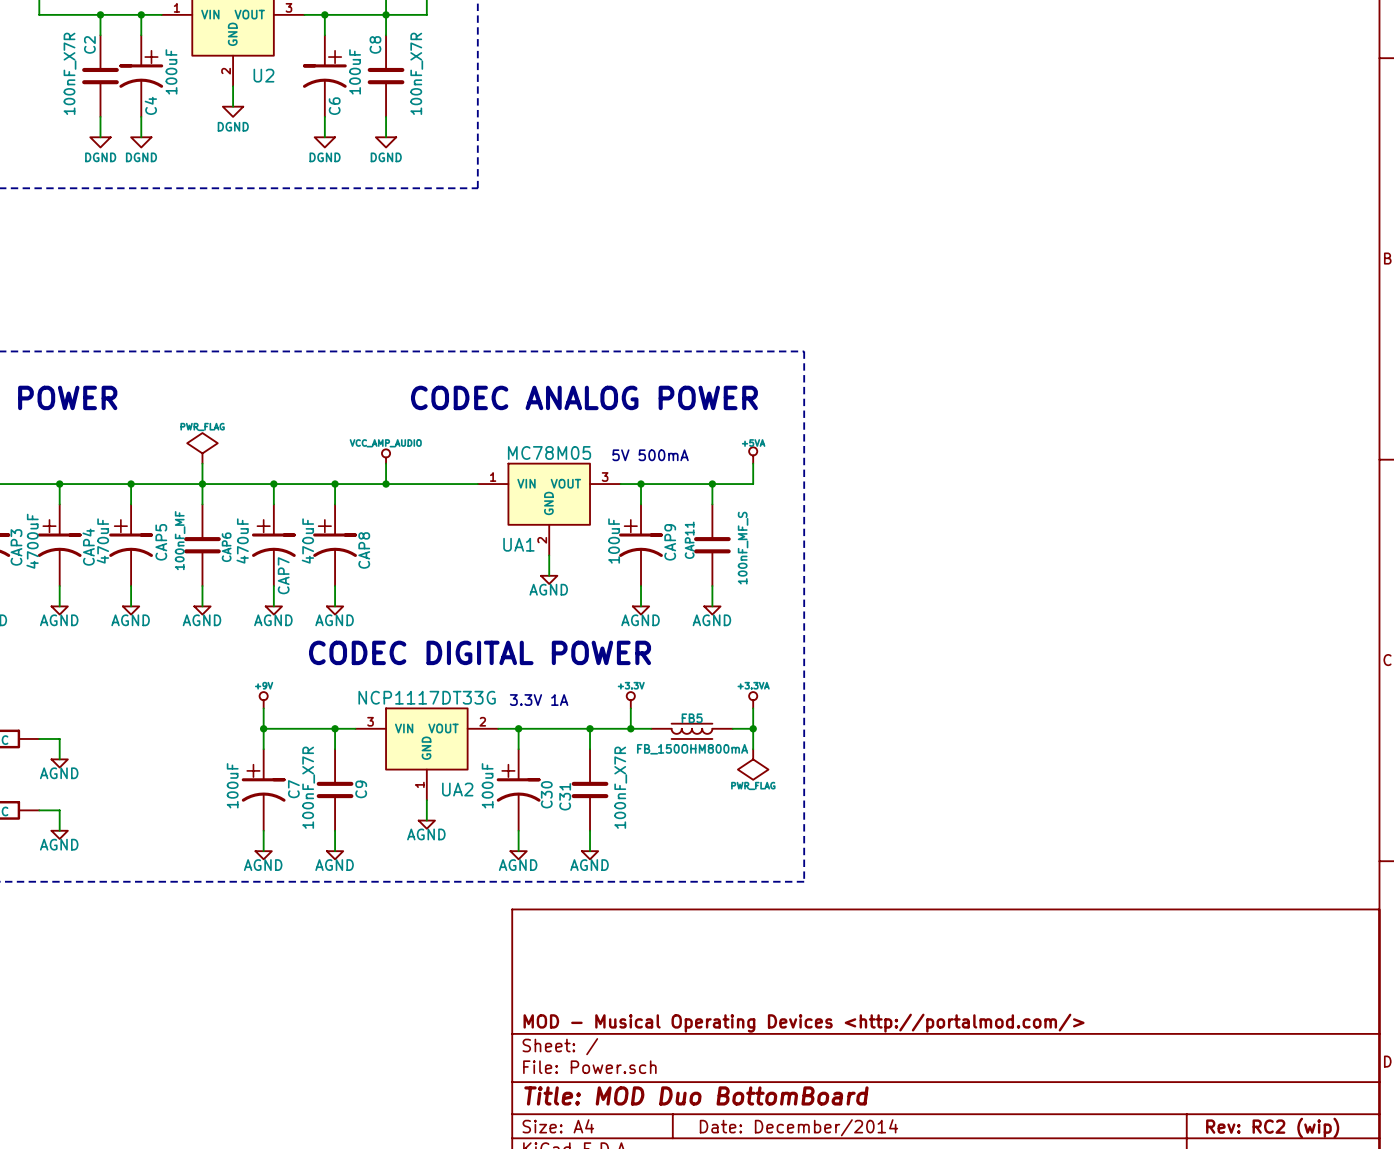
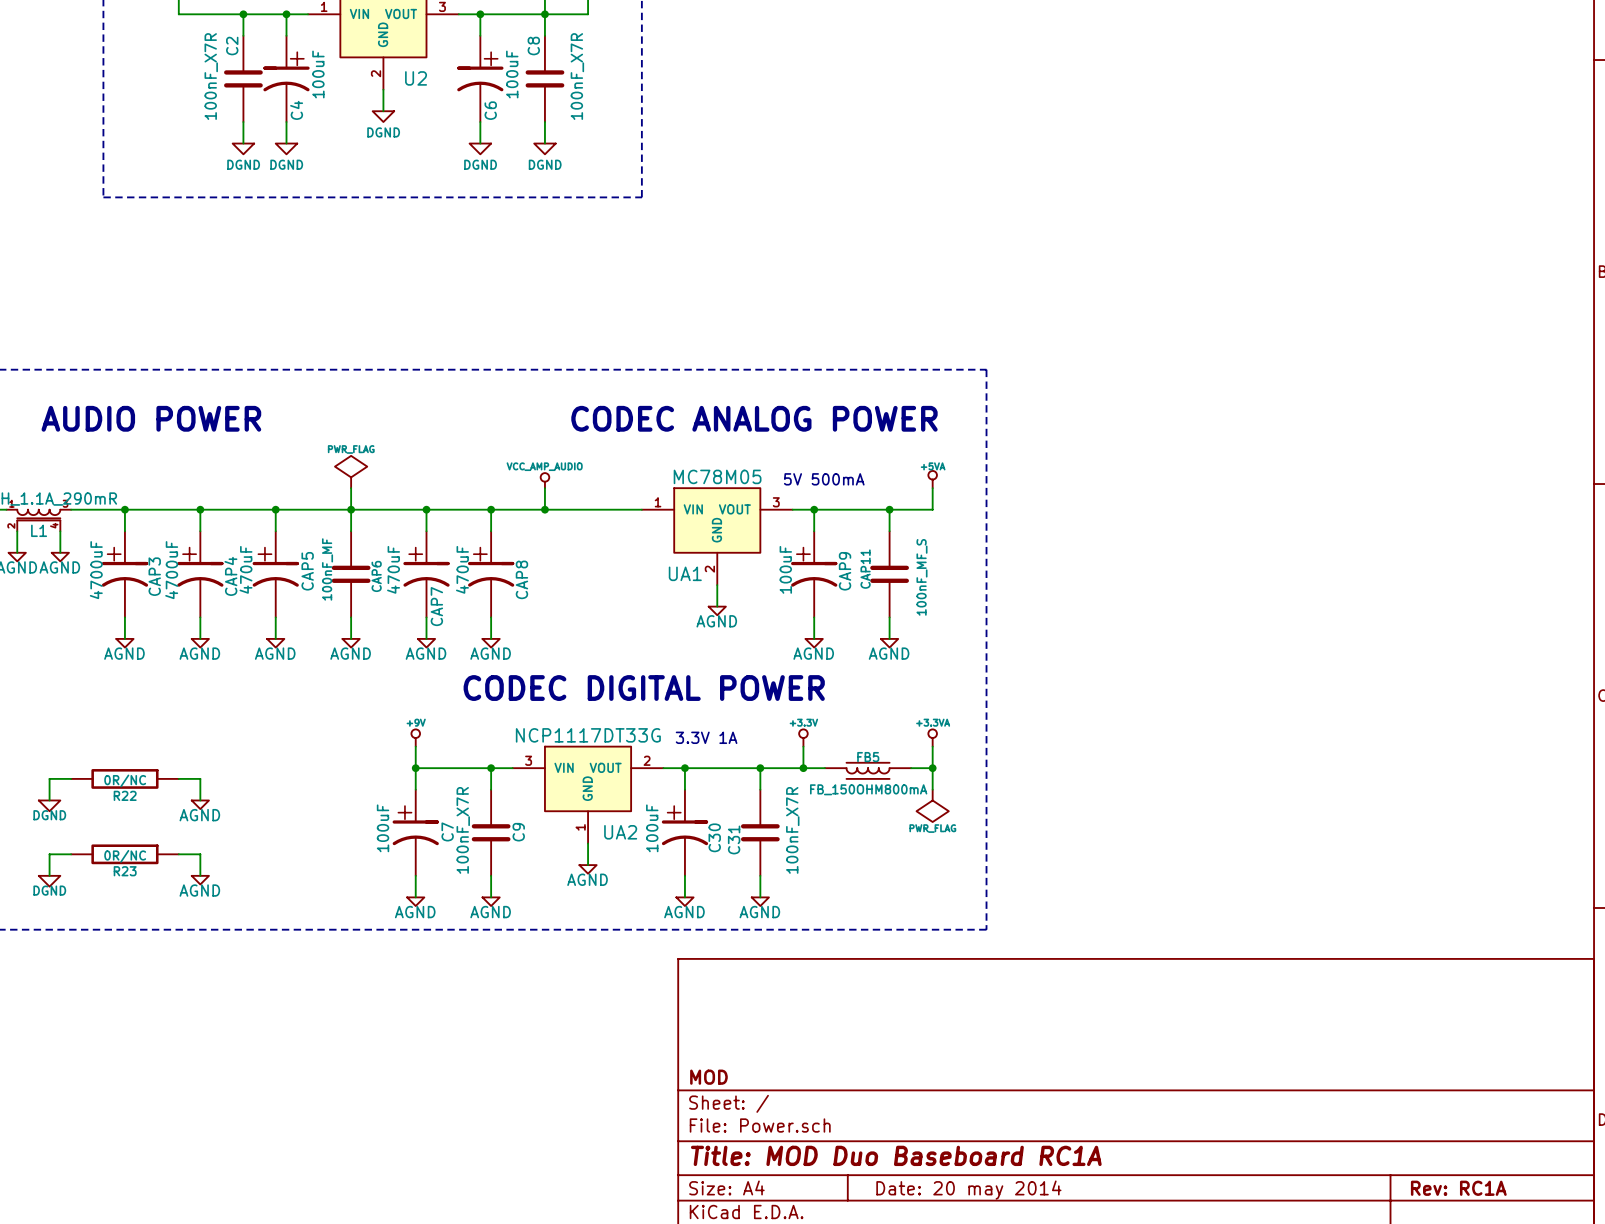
title block: MOD - Musical Operating Devices <http://portalmod.com/> (804, 1023) -> MOD (708, 1077)
title block: Title: MOD Duo BottomBoard (696, 1095) -> Title: MOD Duo Baseboard RC1A (896, 1155)
title block: Date: December/2014 (798, 1127) -> Date: 20 may 2014 (968, 1190)
title block: Rev: RC2 (wip) (1272, 1128) -> Rev: RC1A (1458, 1188)

